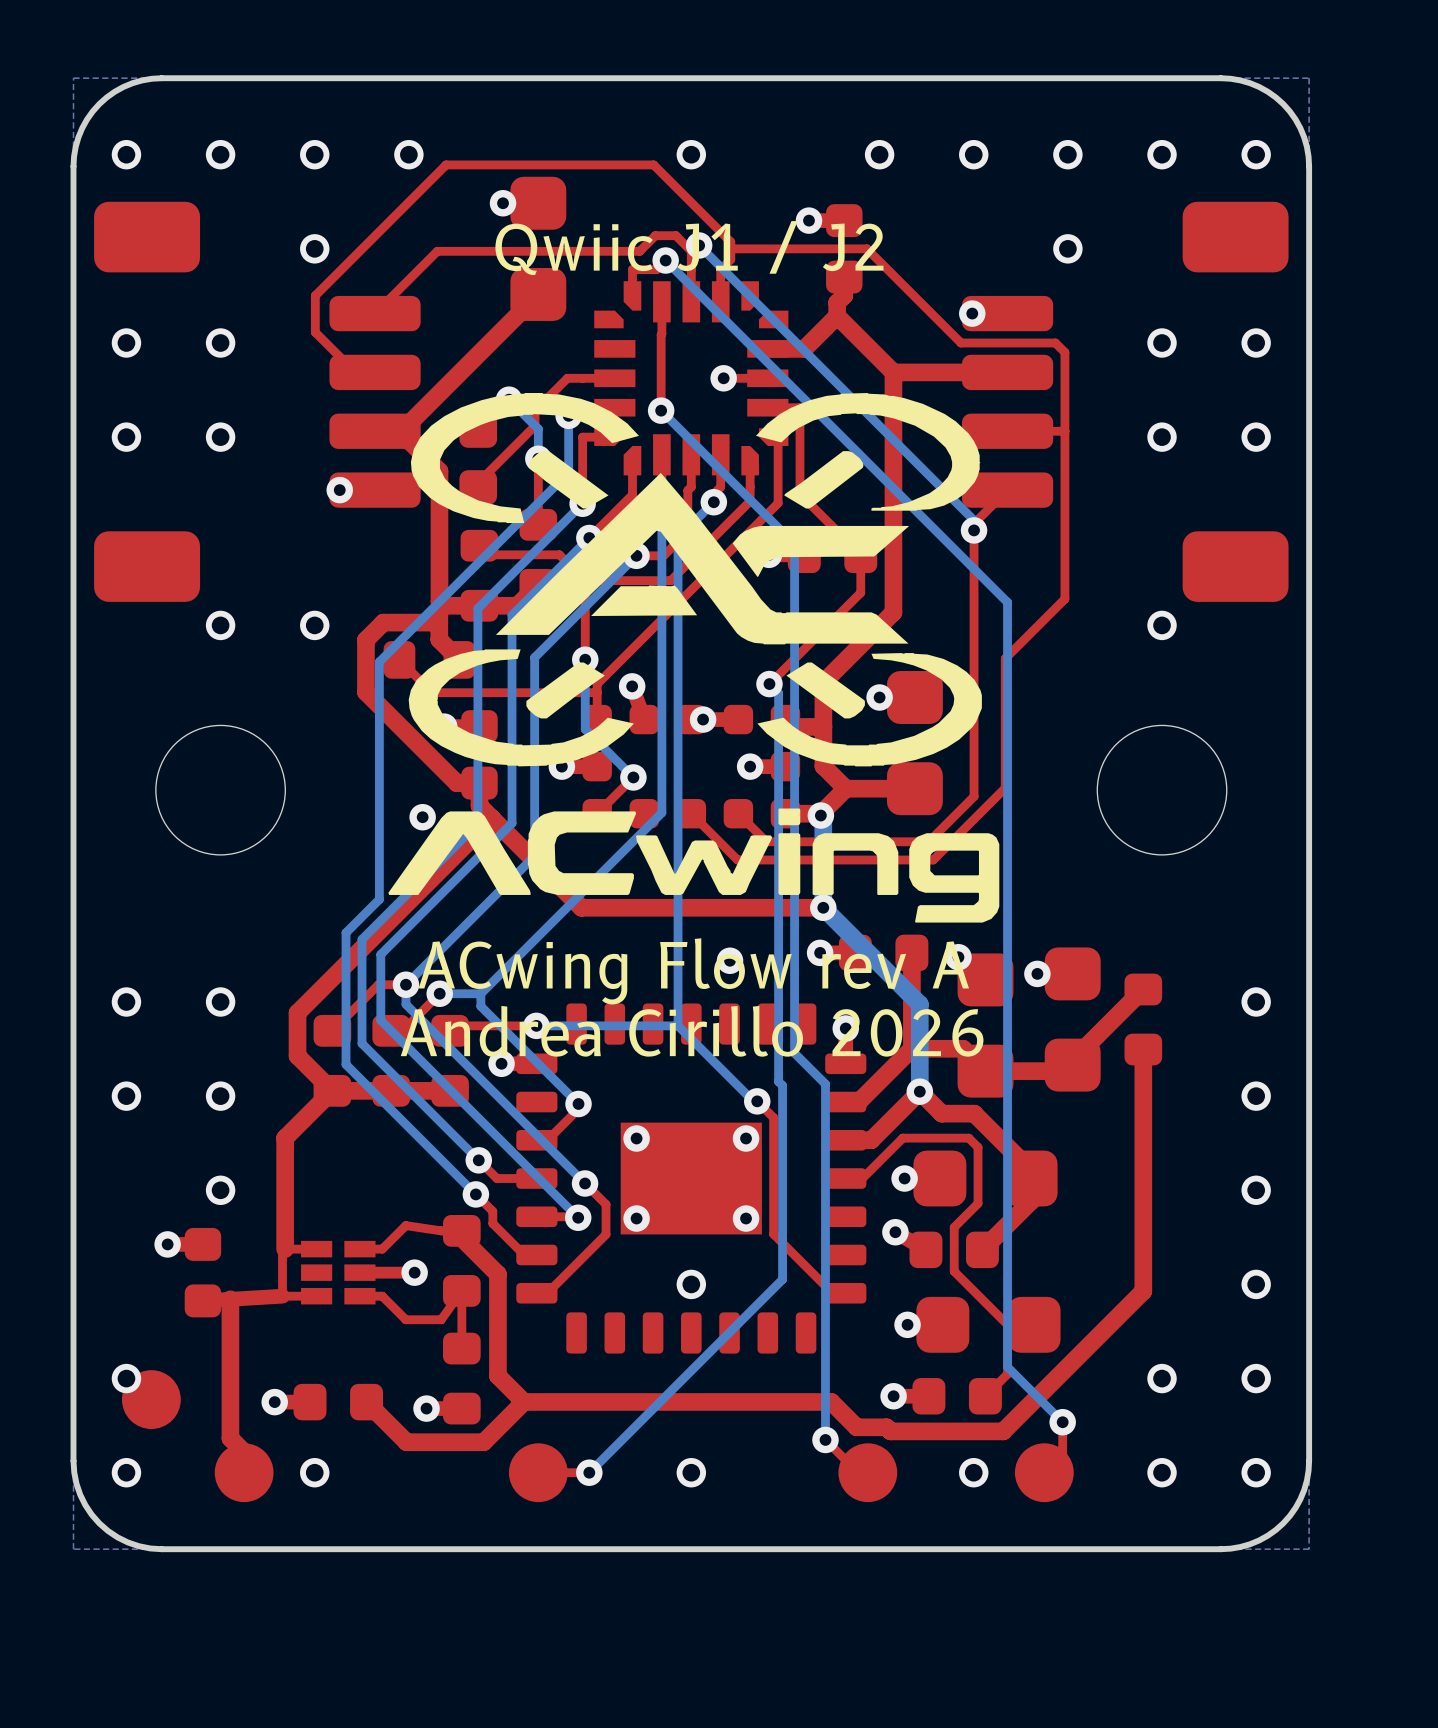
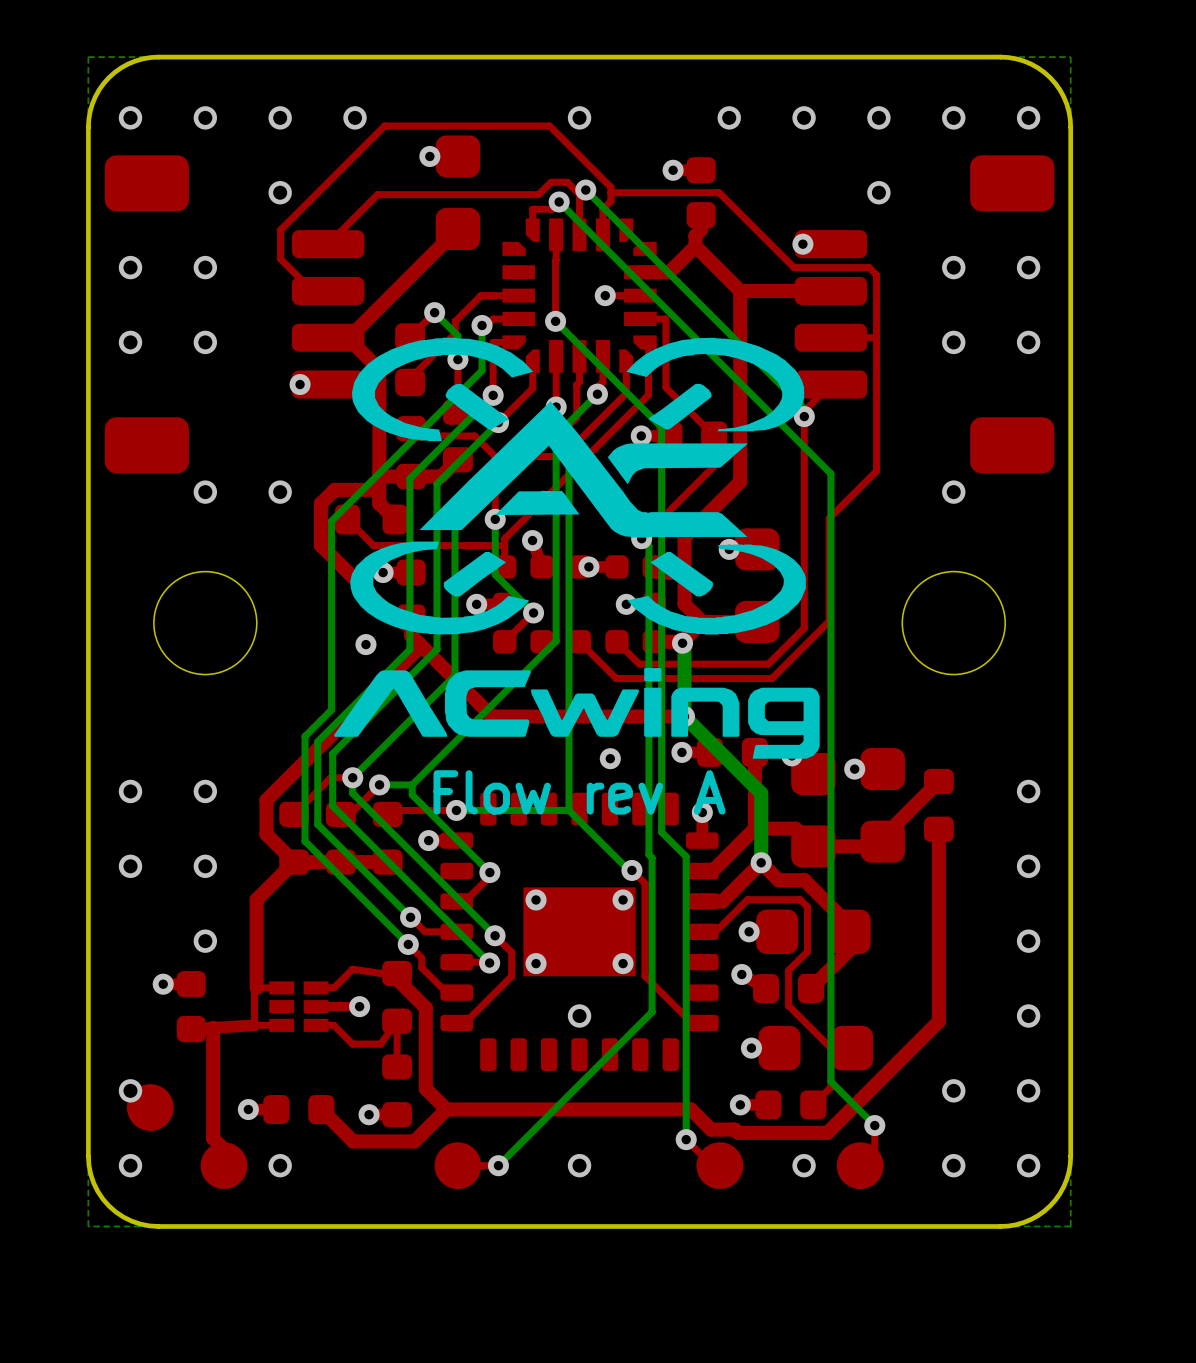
text: Qwiic J1 / J2 (689, 248) -> none
drawing position: (693, 657) -> (576, 548)
text: ACwing Flow rev A (693, 971) -> Flow rev A (579, 792)
text: Andrea Cirillo 2026 (692, 1031) -> none

